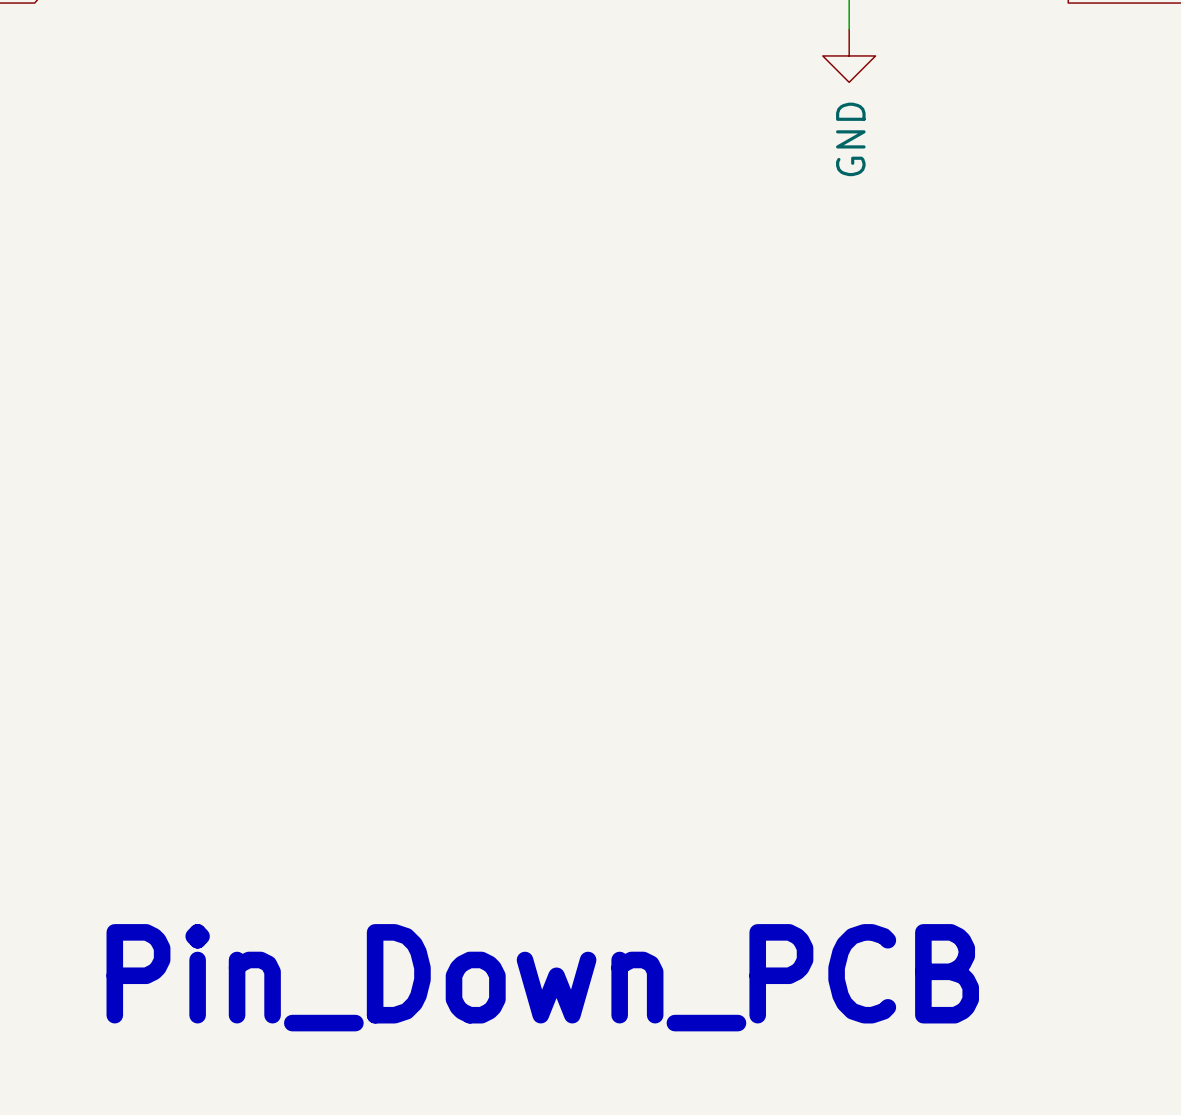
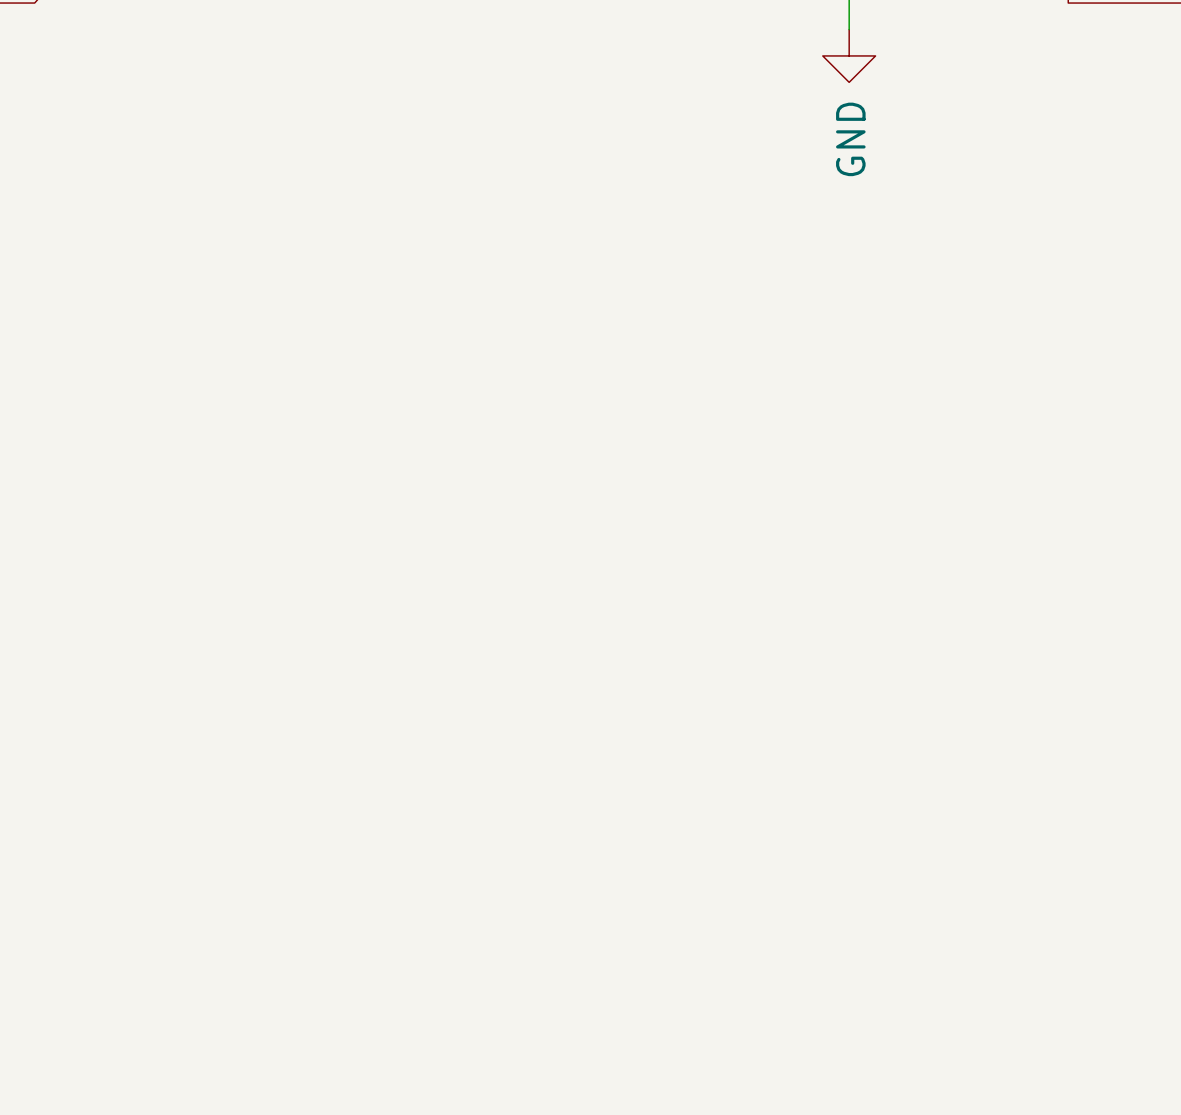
text: Pin_Down_PCB (542, 977) -> none

